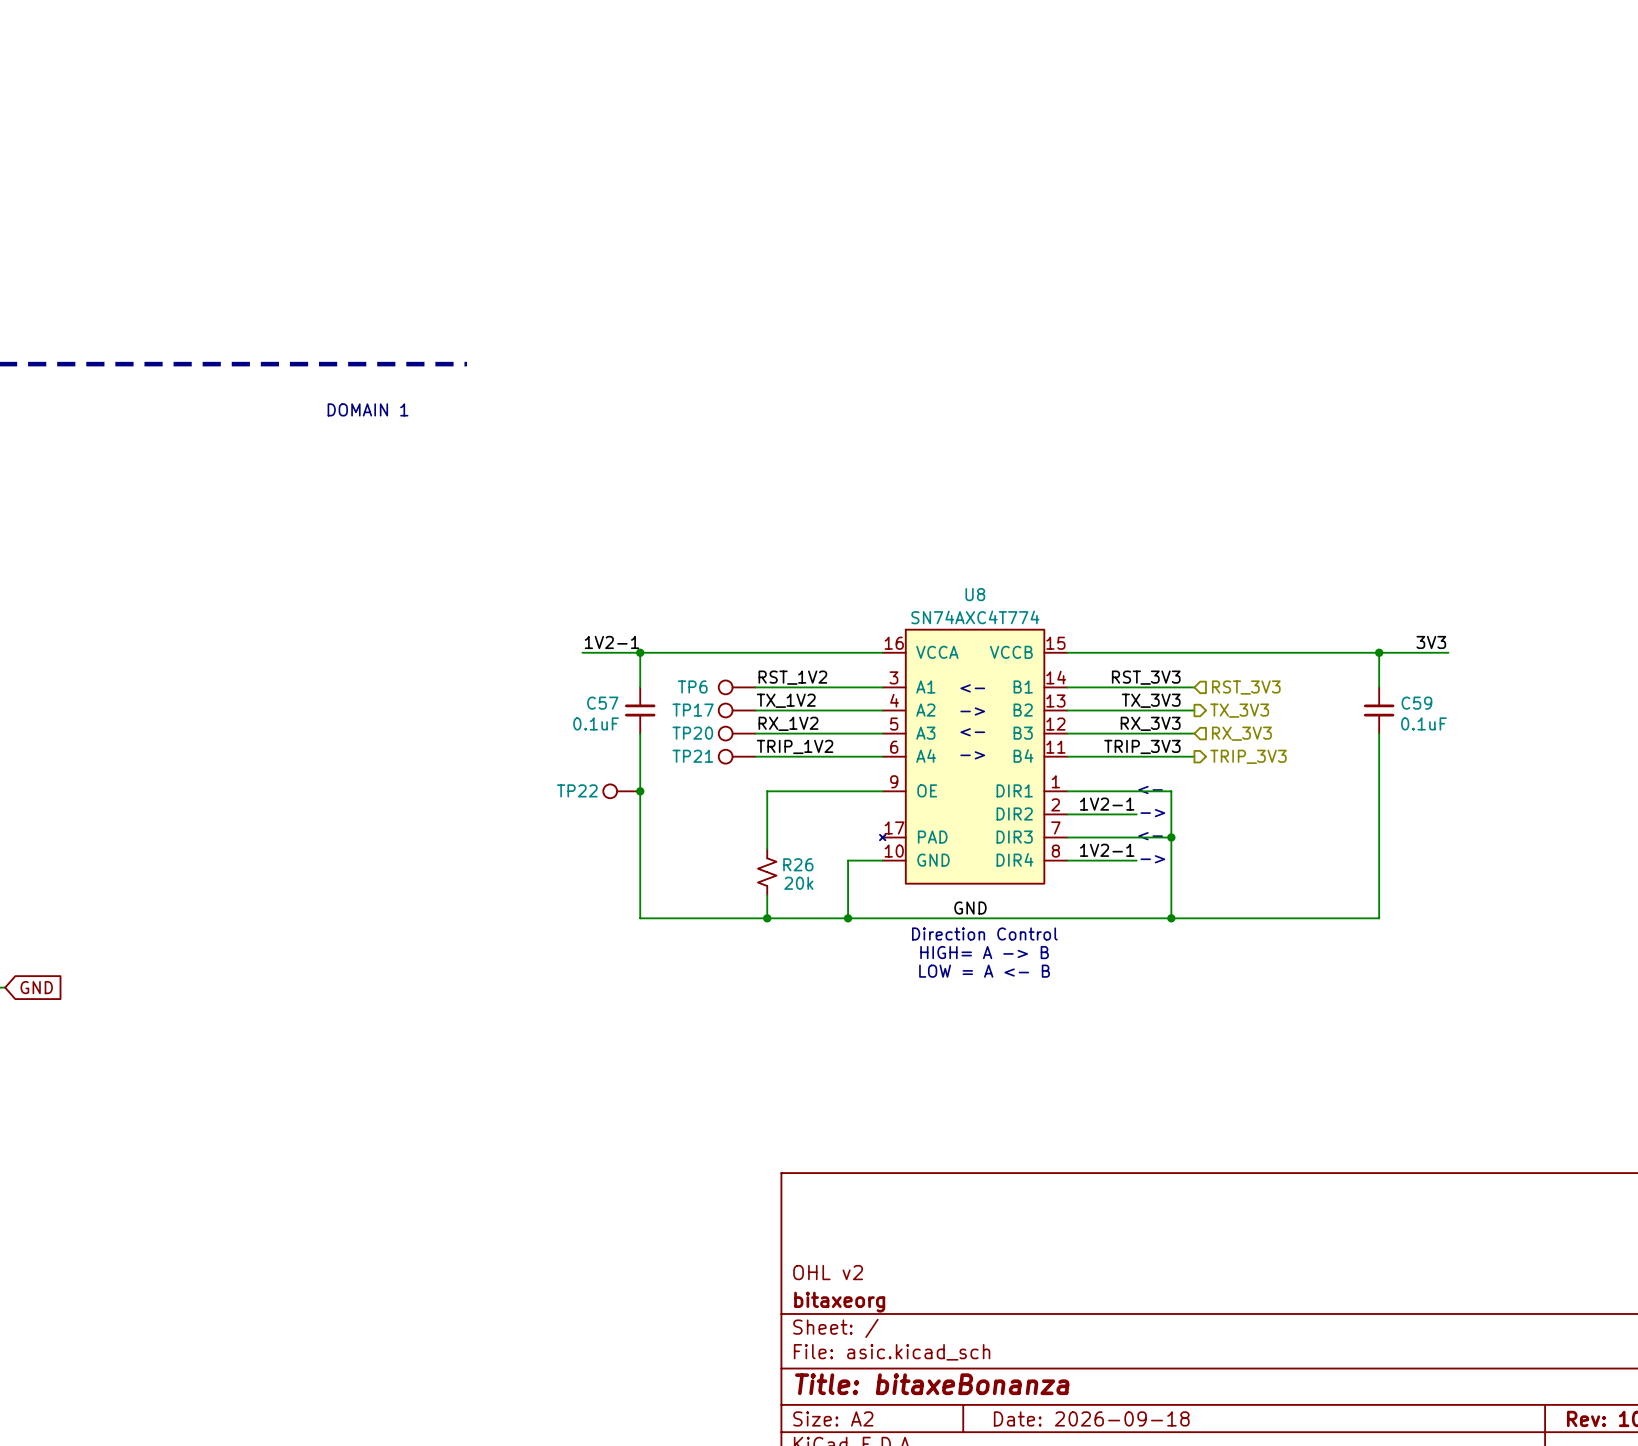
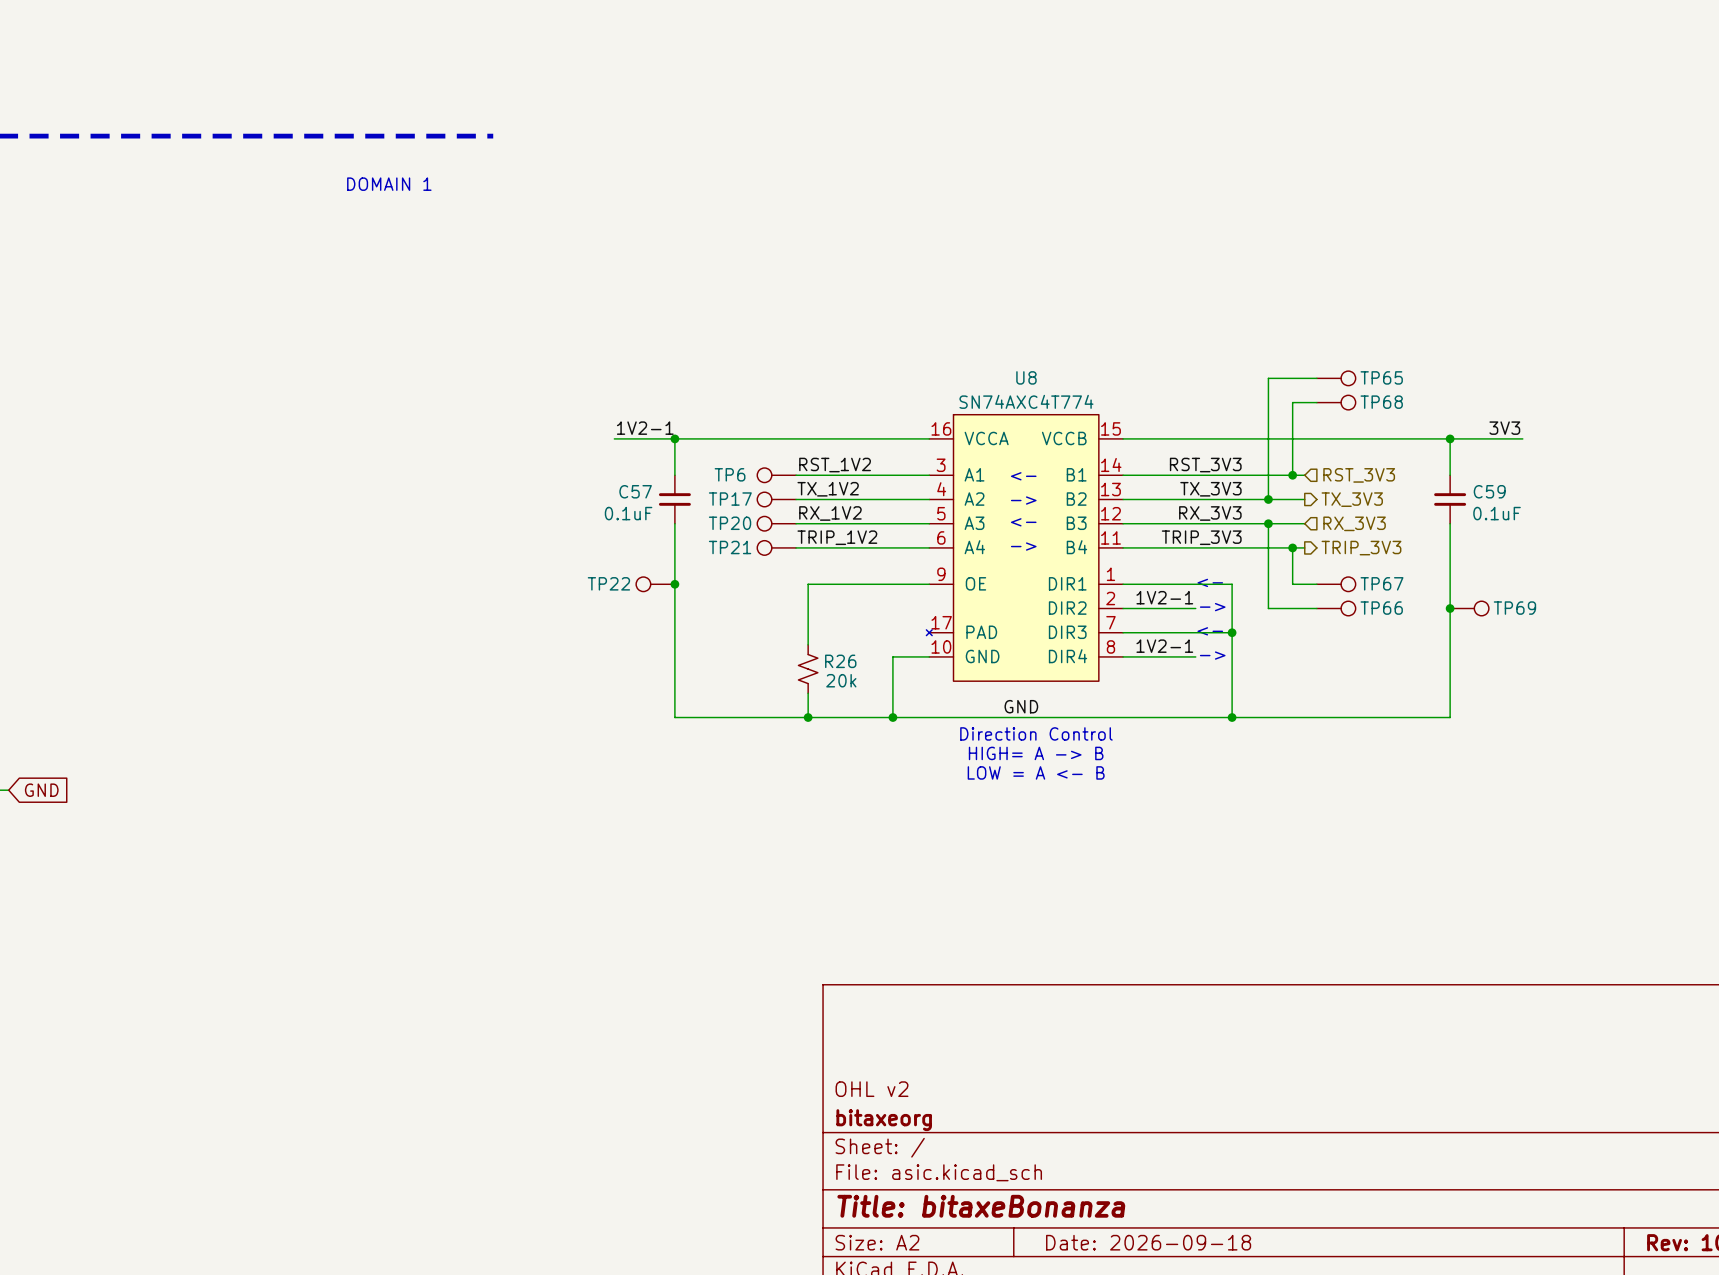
wire: none -> (1316, 378) (1268, 378) (1268, 499)
TP65: none -> (1336, 378)
wire: none -> (1316, 402) (1292, 402) (1292, 475)
TP68: none -> (1336, 402)
wire: none -> (1256, 475) (1304, 475)
junction: none -> (1292, 475)
hierarchical label position: RST_3V3 (1246, 687) -> RST_3V3 (1359, 475)
wire: none -> (1256, 499) (1304, 499)
junction: none -> (1268, 499)
hierarchical label position: TX_3V3 (1239, 710) -> TX_3V3 (1352, 499)
wire: none -> (1256, 523) (1304, 523)
wire: none -> (1268, 523) (1268, 608) (1316, 608)
junction: none -> (1268, 523)
hierarchical label position: RX_3V3 (1241, 733) -> RX_3V3 (1354, 523)
wire: none -> (1256, 547) (1304, 547)
wire: none -> (1292, 547) (1292, 584) (1316, 584)
junction: none -> (1292, 547)
hierarchical label position: TRIP_3V3 (1248, 756) -> TRIP_3V3 (1361, 548)
TP67: none -> (1336, 584)
TP66: none -> (1336, 608)
junction: none -> (1450, 608)
TP69: none -> (1469, 608)

